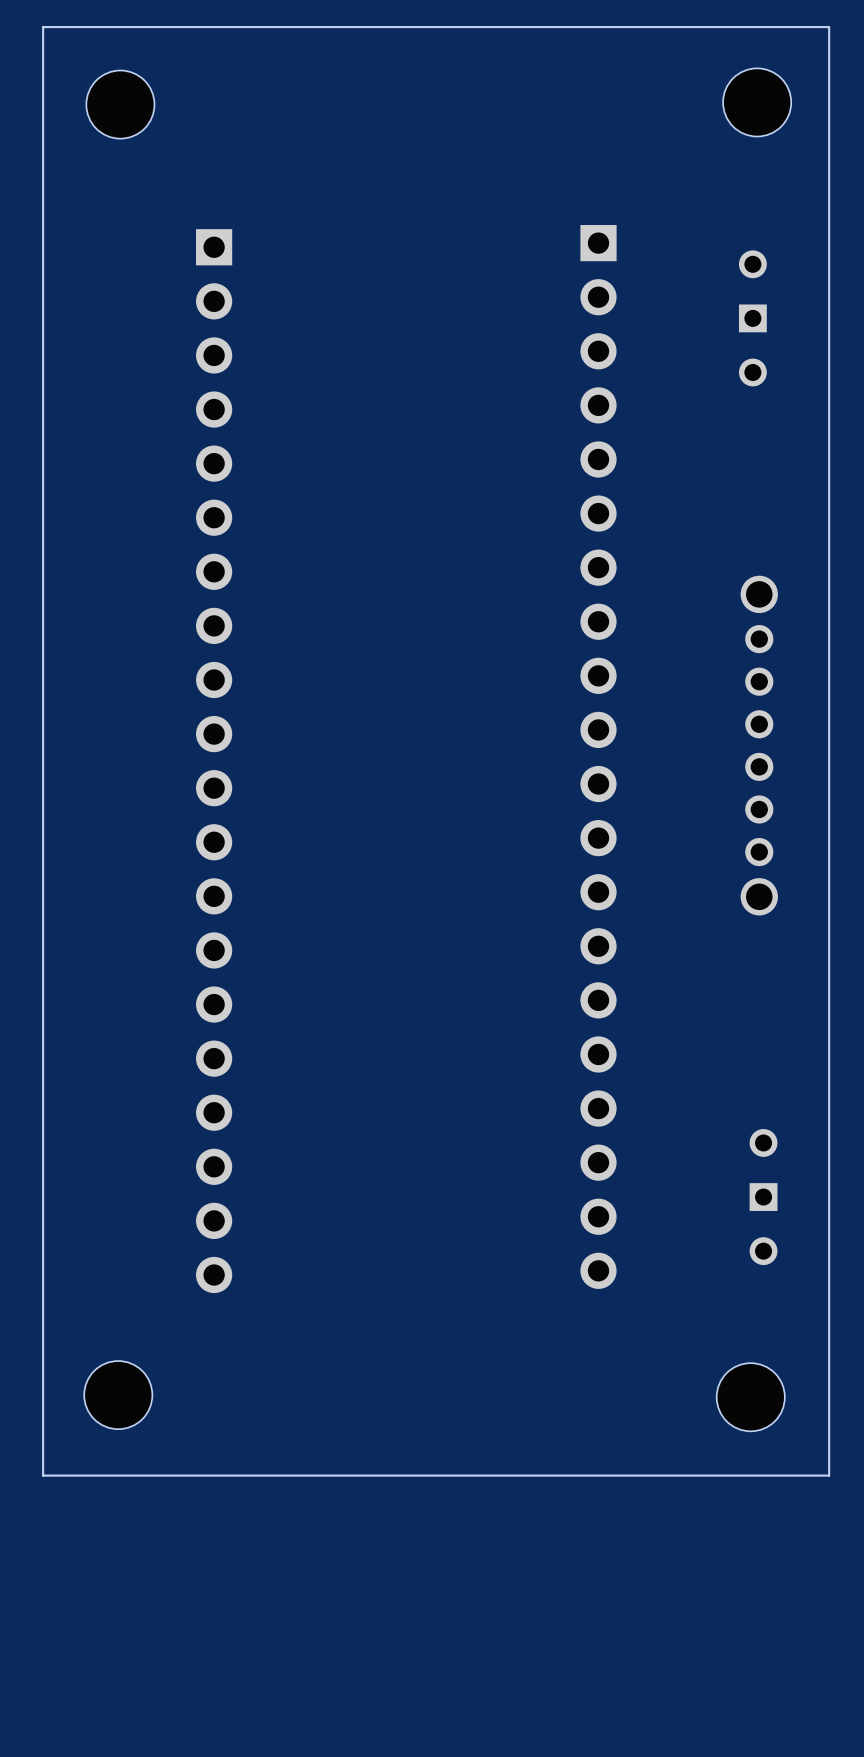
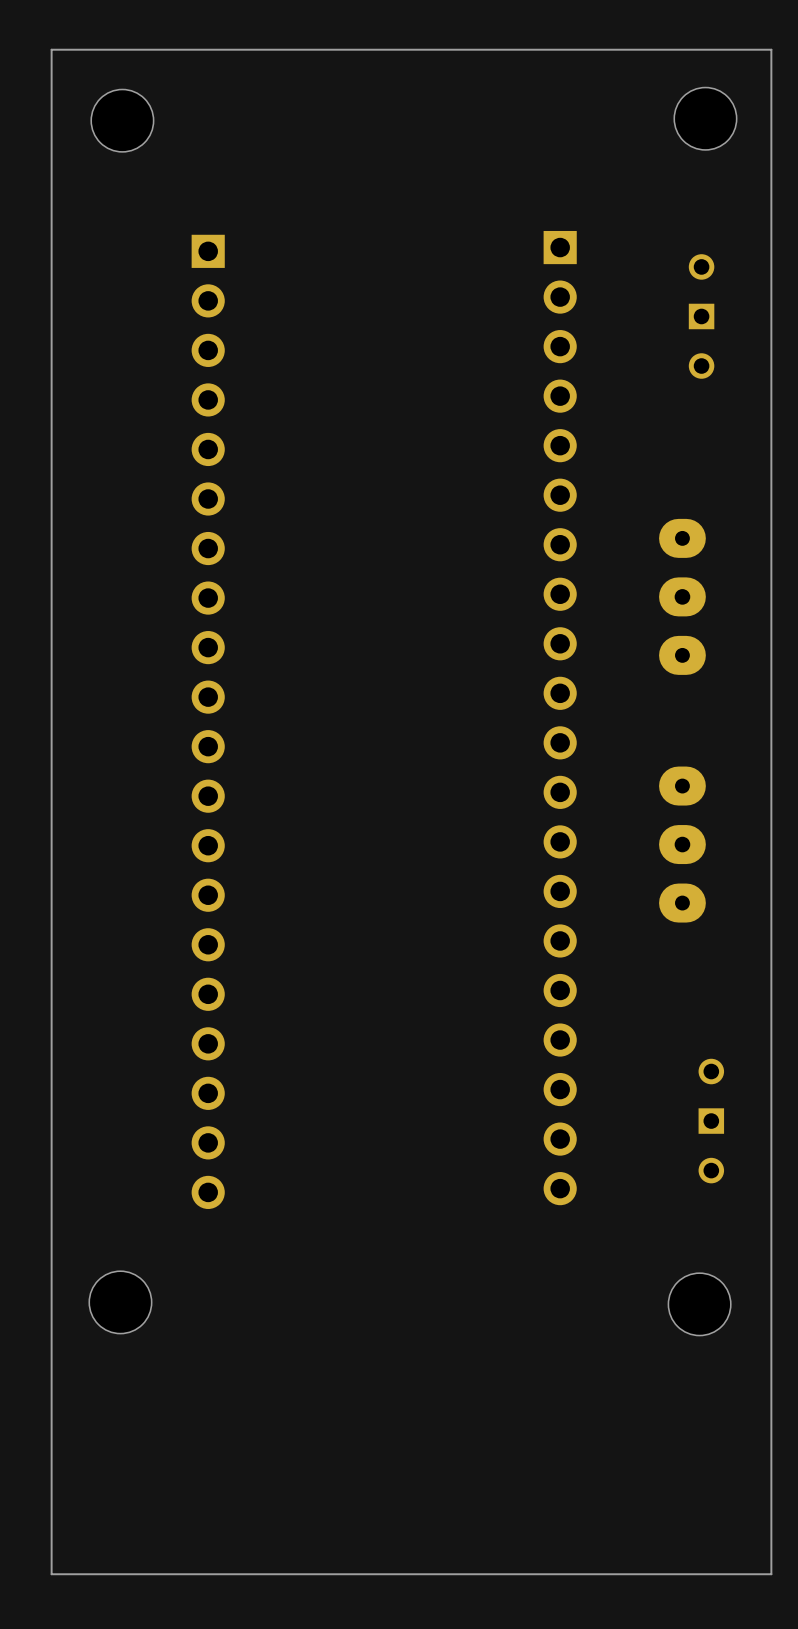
part: none -> (682, 596)
part: (759, 745) -> none
part: none -> (682, 844)
board edge: (829, 1475) (43, 1475) -> (771, 1376) (771, 1574) (51, 1574) (51, 1376)

